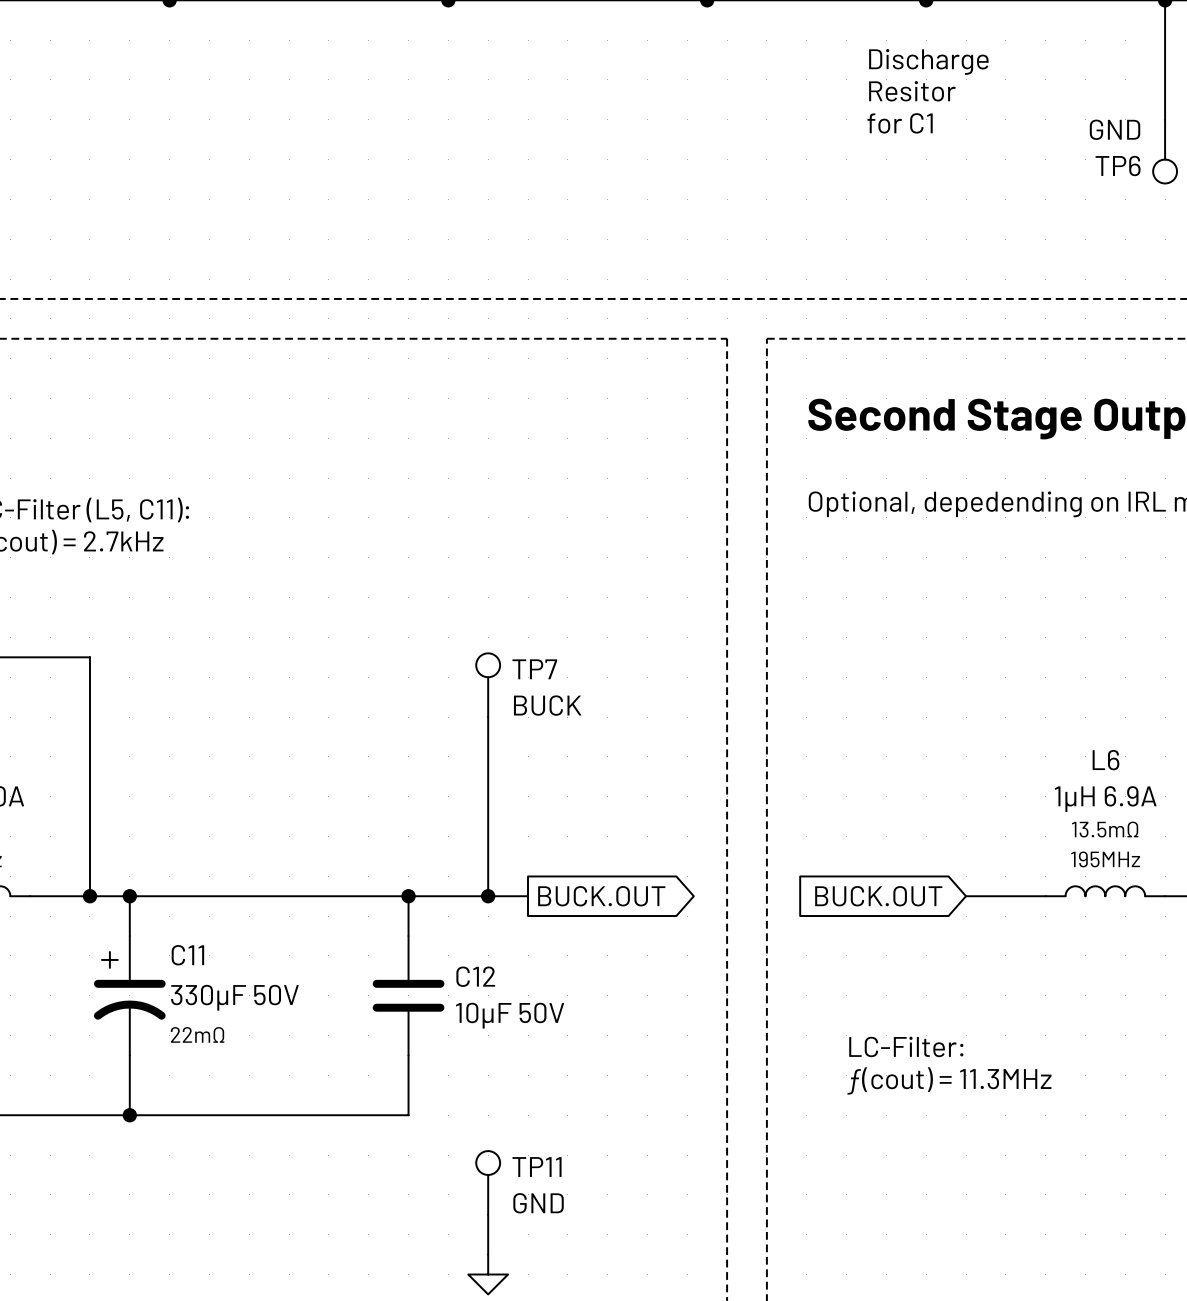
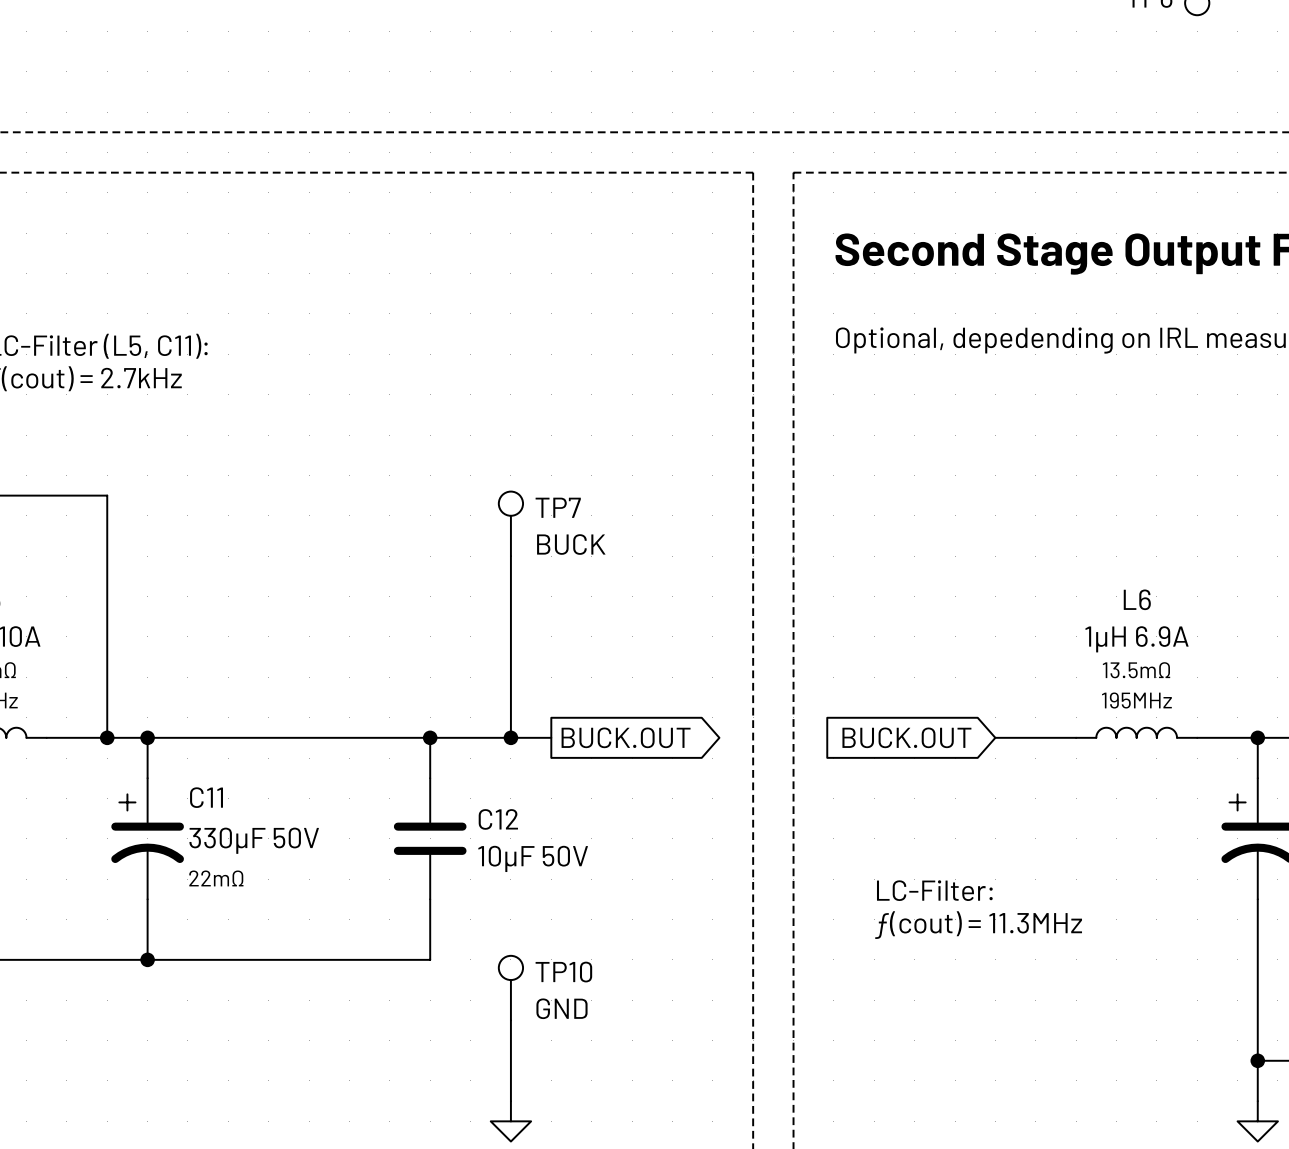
TP10: none -> GND (510, 988)
TP11: GND (488, 1182) -> none

